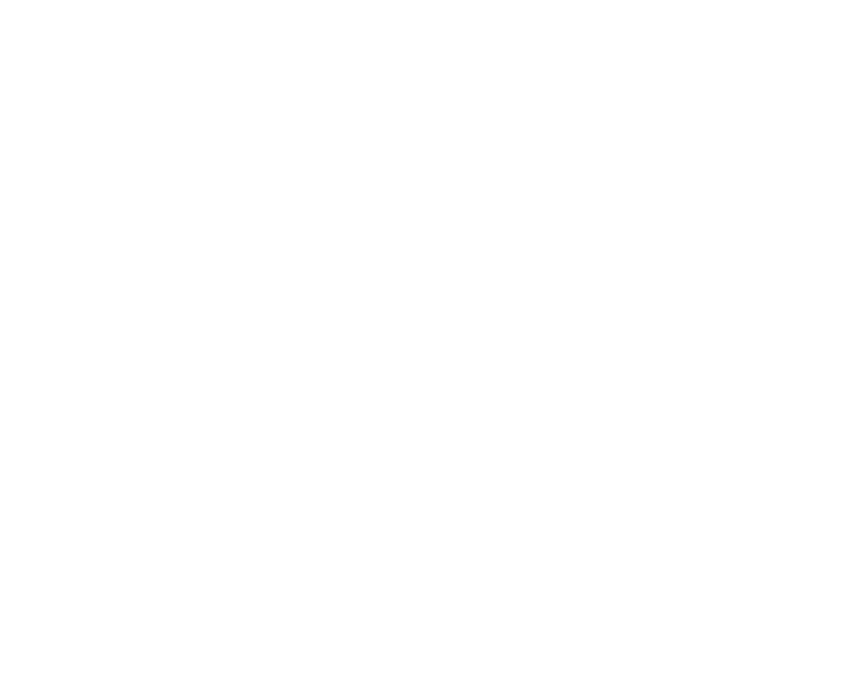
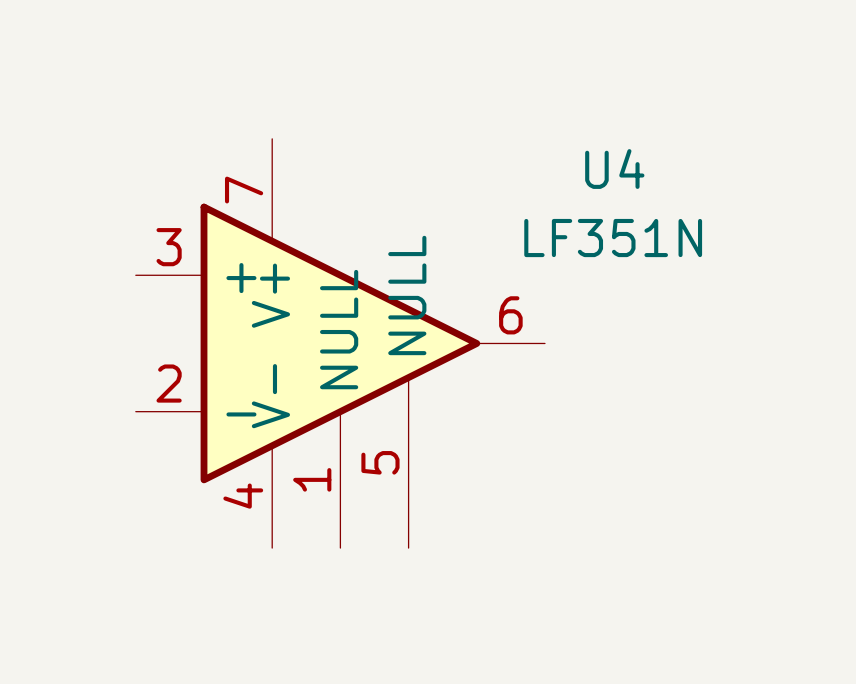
U4: none -> LF351N (340, 343)

